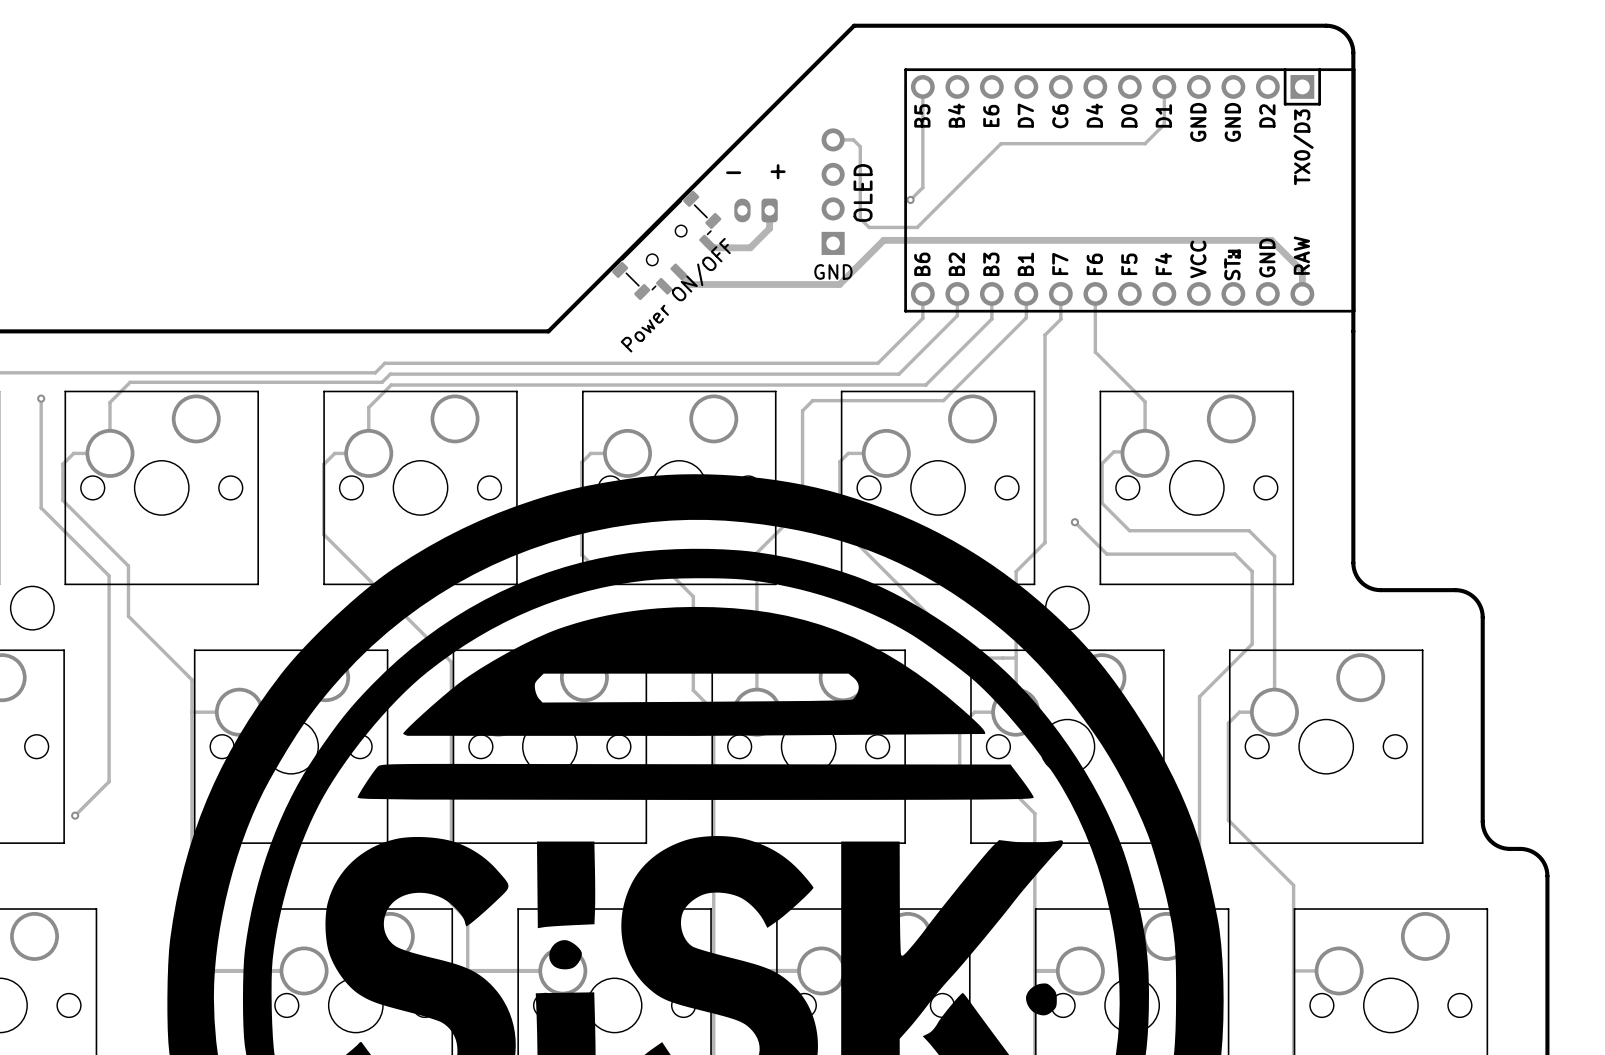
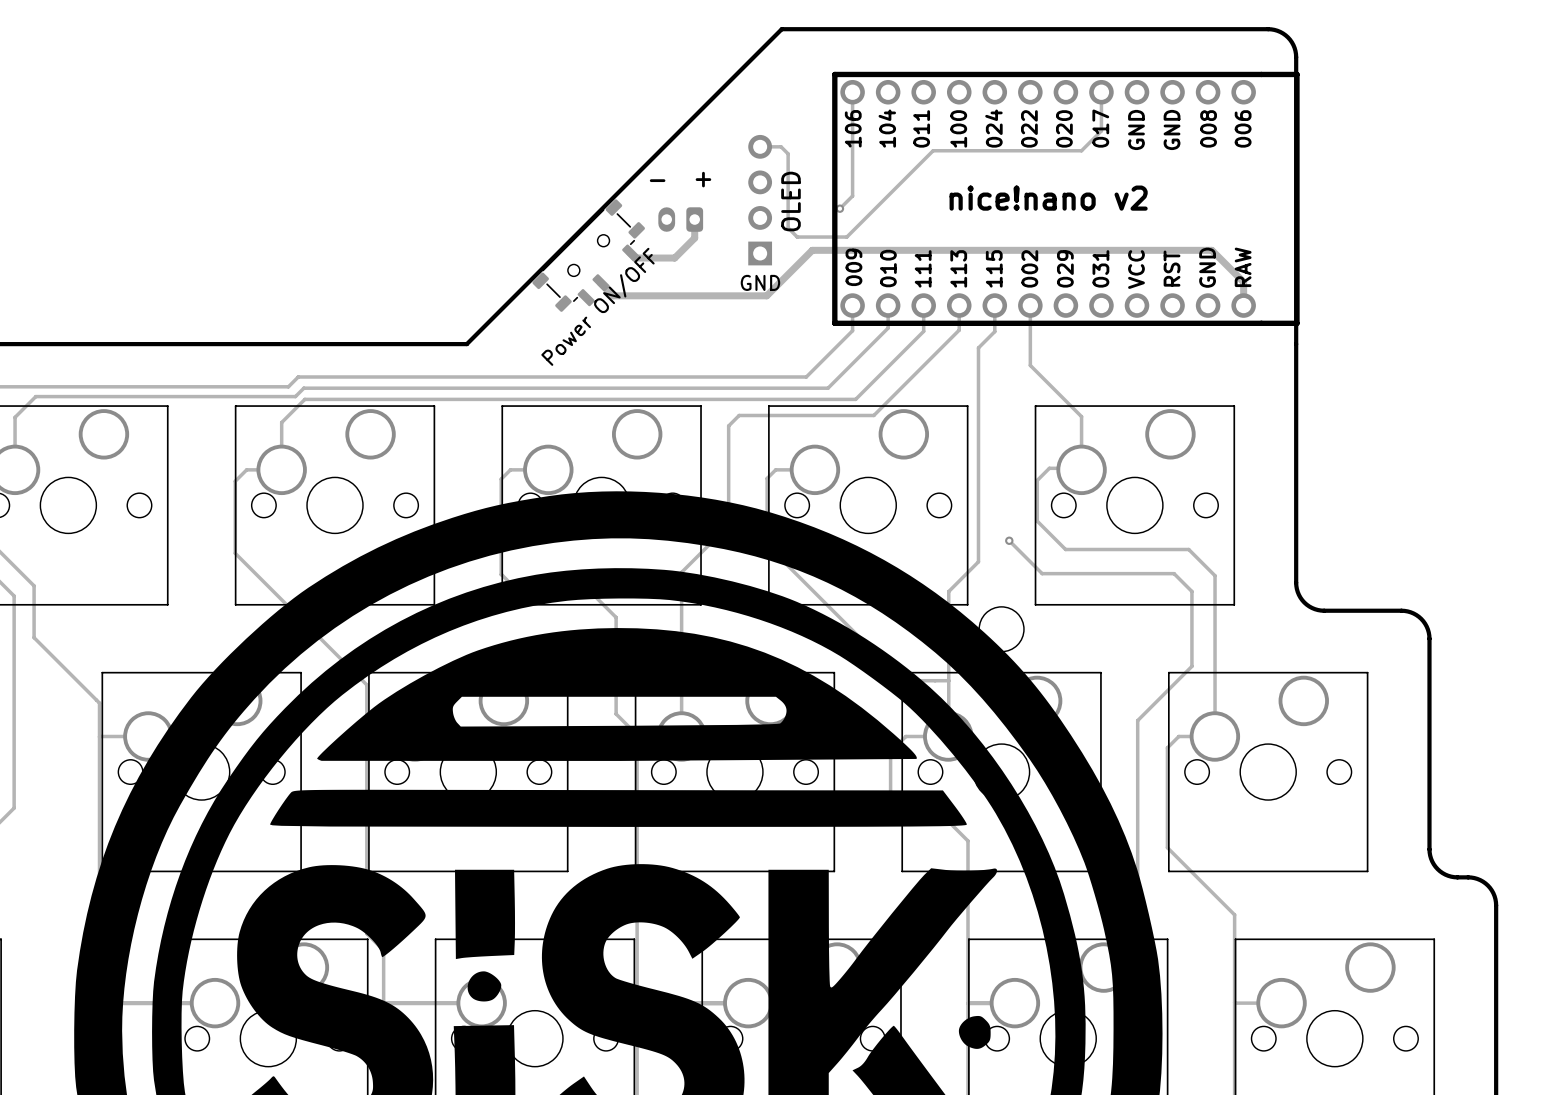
part footprint: [904, 68, 1356, 313] -> [832, 71, 1300, 326]
text: none -> 106 (853, 128)
text: none -> 009 (853, 267)

